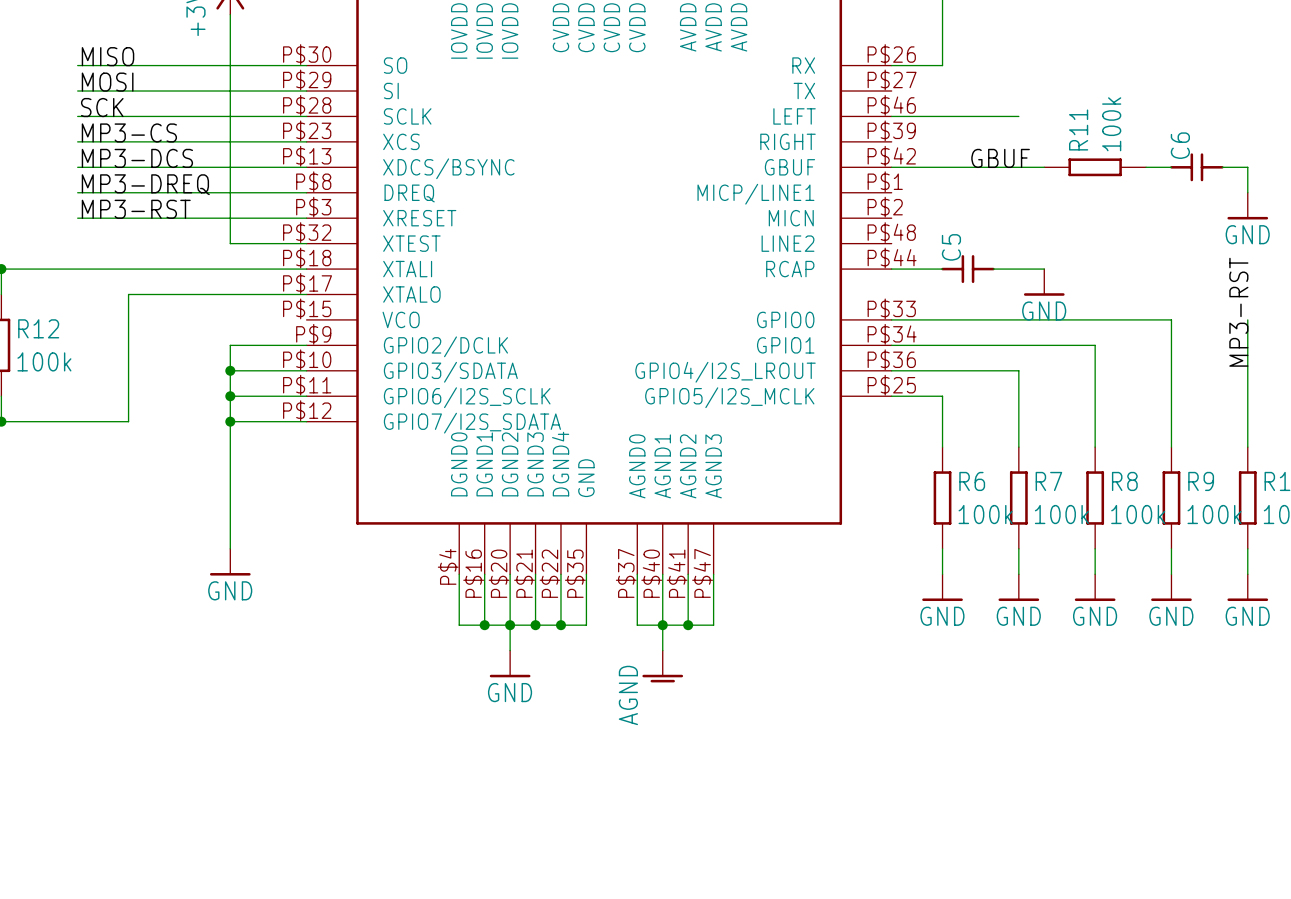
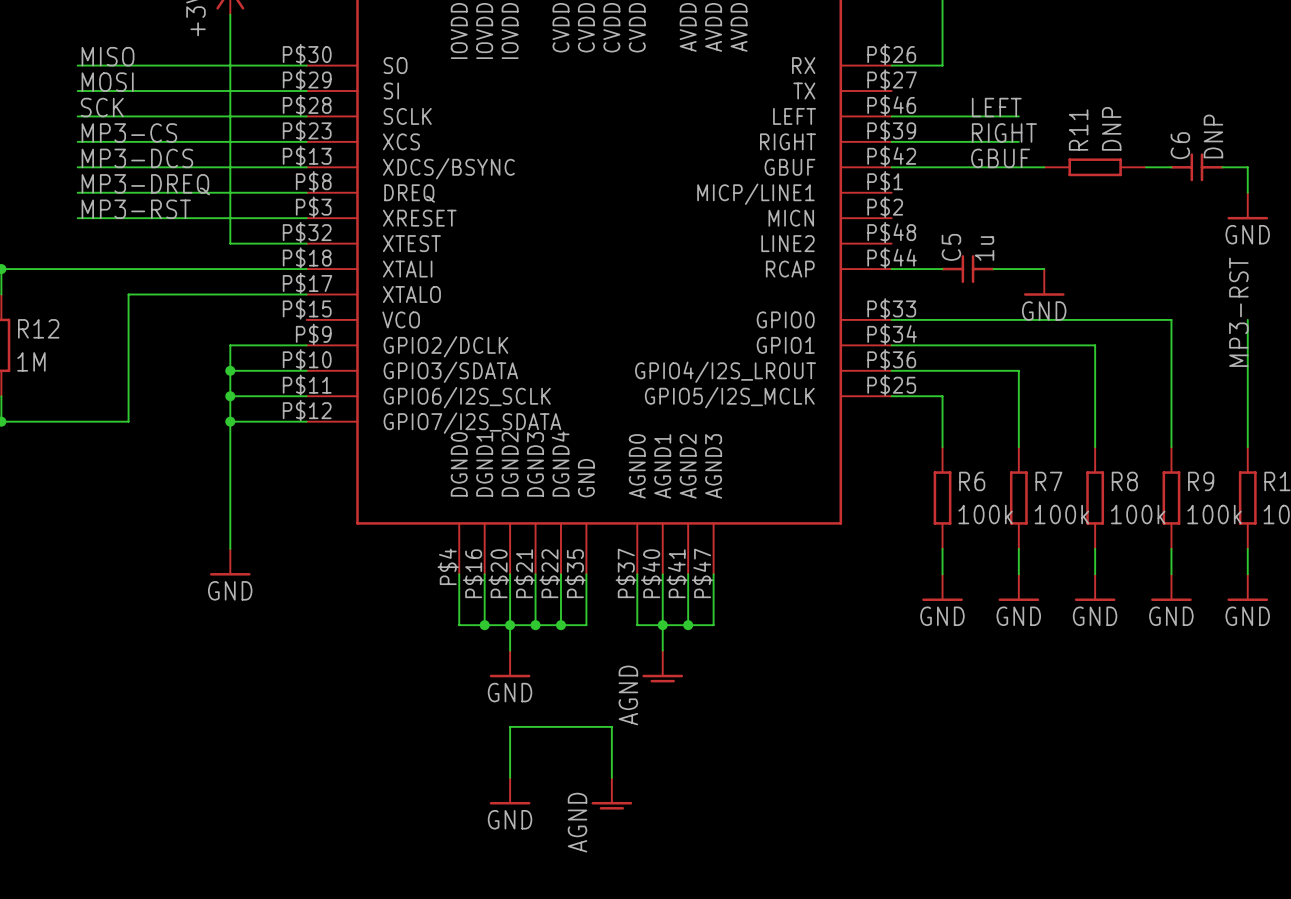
label: none -> LEFT (996, 107)
R11 value: 100k (1111, 124) -> DNP (1111, 128)
label: none -> RIGHT (1004, 132)
C6 value: none -> DNP (1213, 136)
wire: none -> (891, 141) (1018, 141)
C5 value: none -> 1u (984, 248)
R12 value: 100k (44, 361) -> 1M (31, 361)
wire: none -> (510, 777) (510, 726) (611, 726) (611, 777)
power symbol: none -> GND (510, 791)
power symbol: none -> AGND (611, 793)

